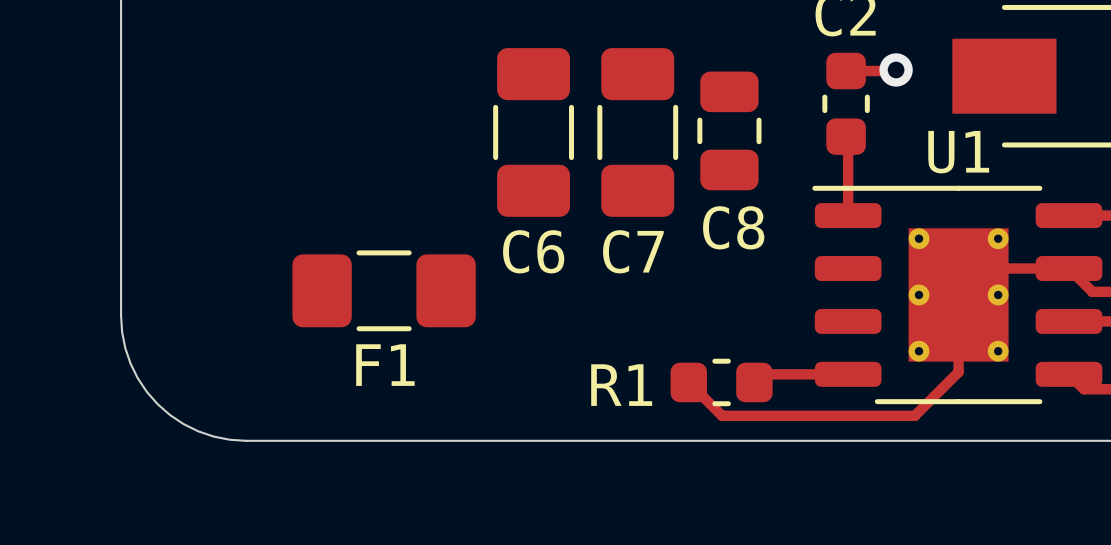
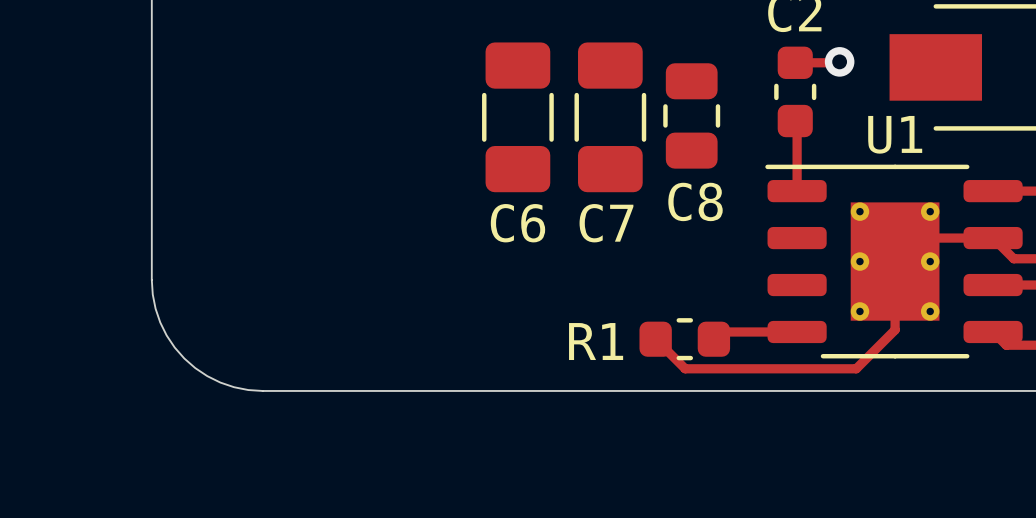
F1: (384, 290) -> none

